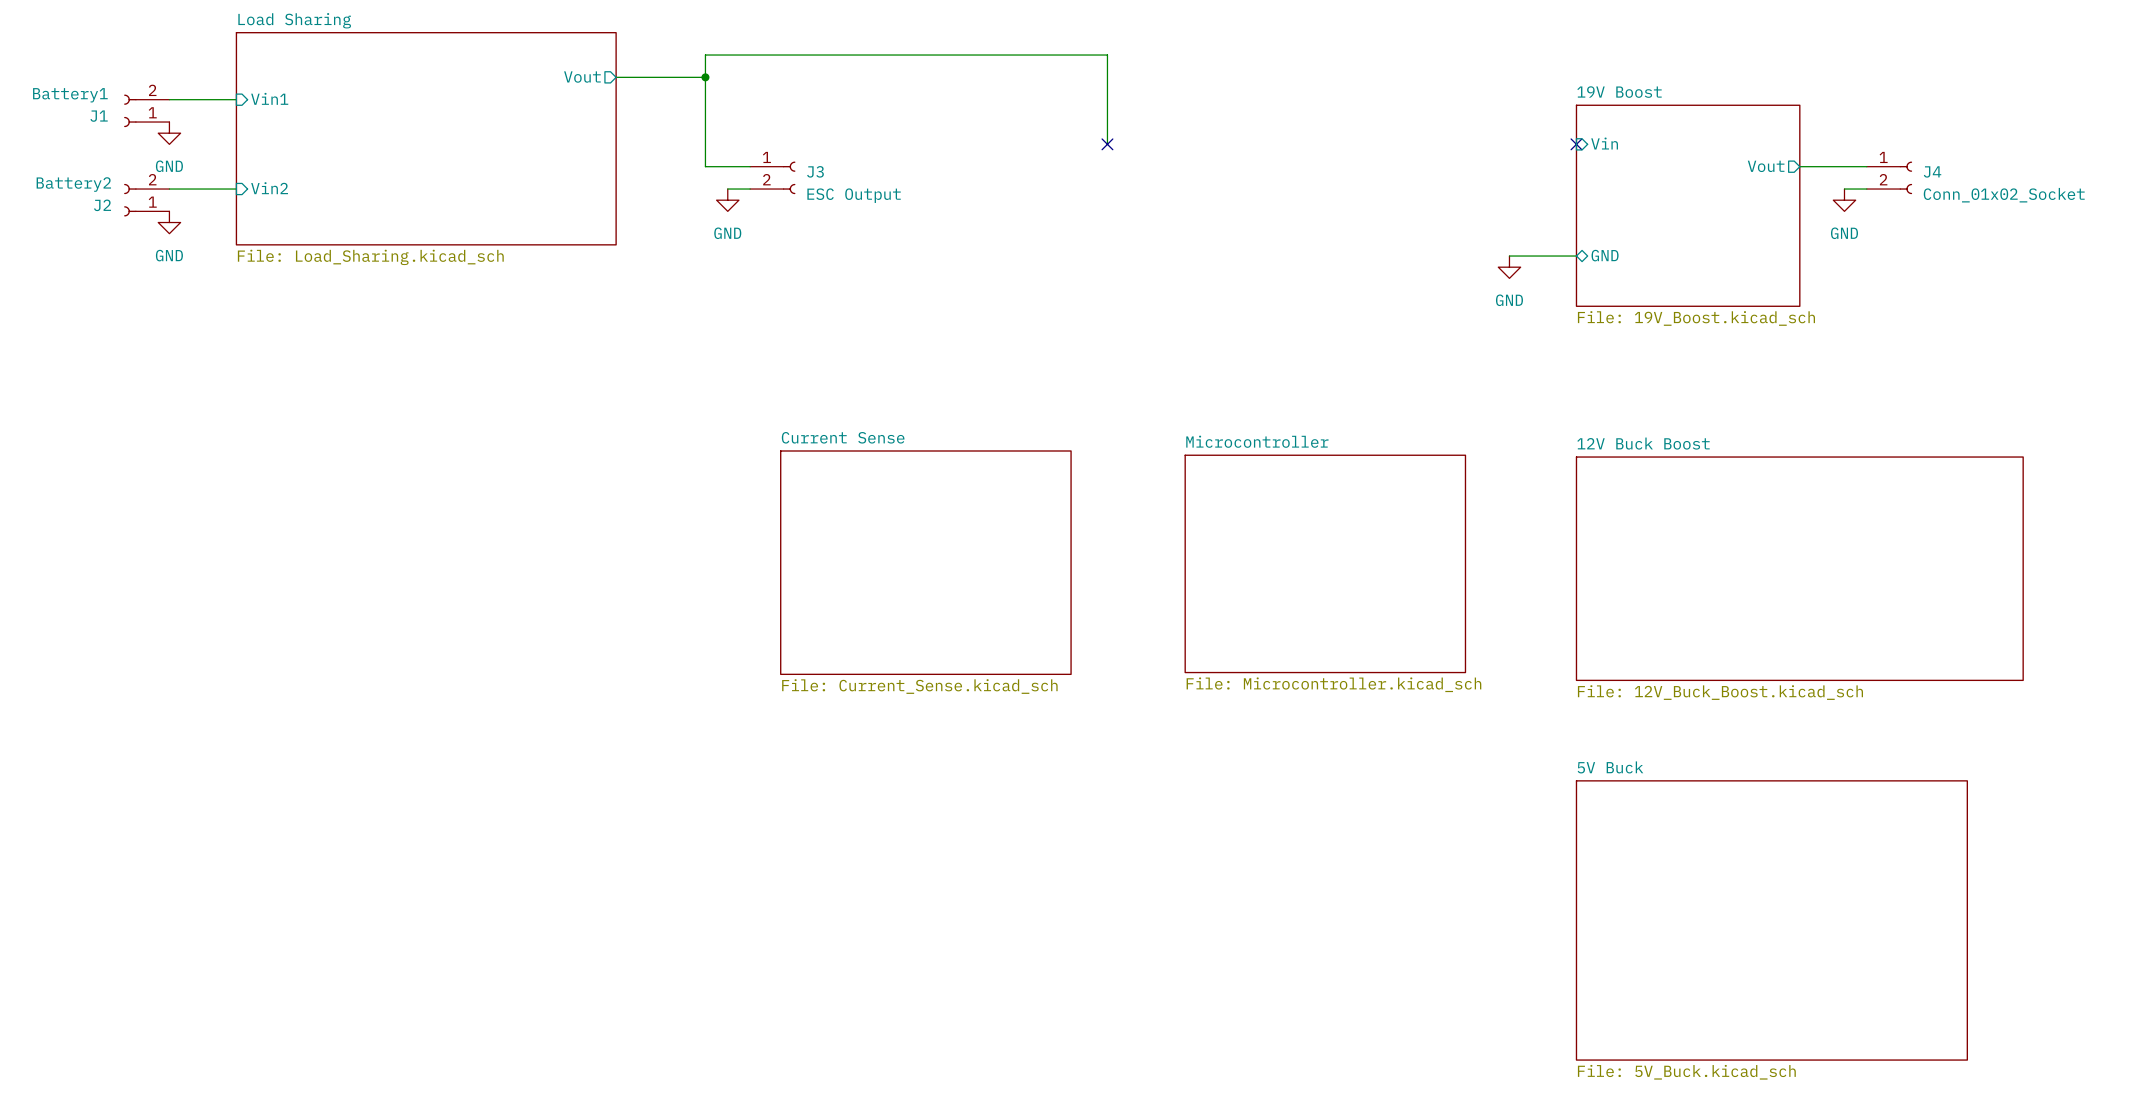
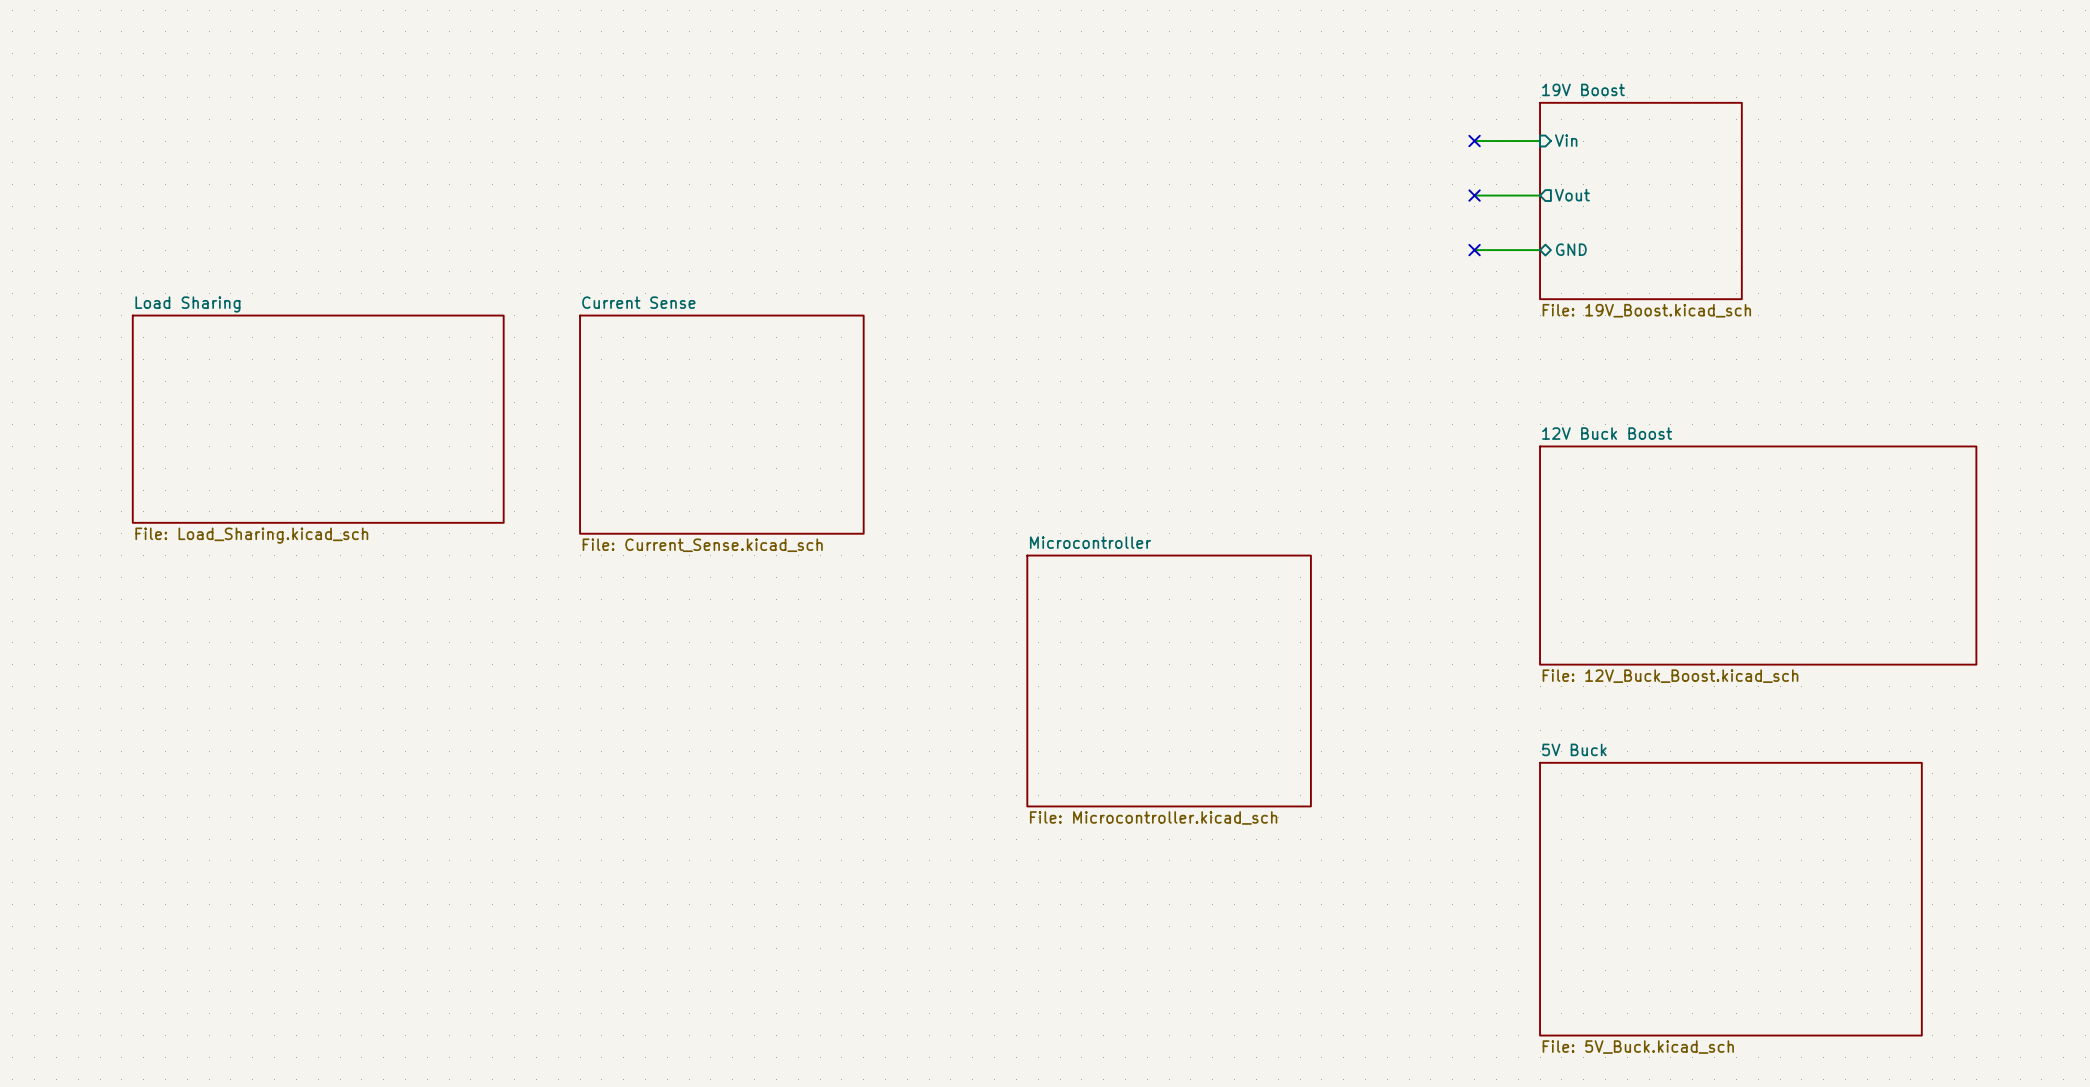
sheet pin: Vout (582, 77) -> none
wire: (616, 77) (705, 77) -> none
junction: (705, 77) -> none
sheet pin: Vin1 (269, 98) -> none
wire: (169, 99) (236, 99) -> none
sheet 19V Boost shape: [1575, 104, 1801, 307] -> [1539, 102, 1743, 300]
J1: Battery1 (146, 110) -> none
power symbol: GND (169, 133) -> none
sheet Load Sharing: File: Load_Sharing.kicad_sch (426, 138) -> none
wire: (1107, 144) (1107, 55) (705, 55) (705, 166) (750, 166) -> none
no-connect mark: (1107, 144) -> none
wire: none -> (1474, 141) (1540, 141)
no-connect mark: none -> (1474, 141)
no-connect mark: (1576, 144) -> none
sheet pin rotation: 0° (1766, 166) -> 180° (1572, 195)
sheet pin position: Vout (1766, 166) -> Vout (1572, 195)
wire: (1799, 166) (1866, 166) -> none
J3: ESC Output (772, 177) -> none
J4: Conn_01x02_Socket (1889, 177) -> none
sheet pin: Vin2 (269, 188) -> none
wire: (169, 189) (236, 189) -> none
wire: (727, 189) (750, 189) -> none
wire: (1844, 189) (1866, 189) -> none
J2: Battery2 (146, 200) -> none
power symbol: GND (727, 200) -> none
wire: none -> (1474, 195) (1540, 195)
no-connect mark: none -> (1474, 195)
power symbol: GND (1844, 200) -> none
power symbol: GND (169, 222) -> none
no-connect mark: none -> (1474, 250)
power symbol: GND (1509, 267) -> none
sheet Load Sharing: none -> File: Load_Sharing.kicad_sch (318, 419)
sheet Current Sense: none -> File: Current_Sense.kicad_sch (721, 424)
sheet Current Sense: File: Current_Sense.kicad_sch (925, 562) -> none
sheet Microcontroller: File: Microcontroller.kicad_sch (1325, 563) -> none
sheet Microcontroller: none -> File: Microcontroller.kicad_sch (1169, 681)

